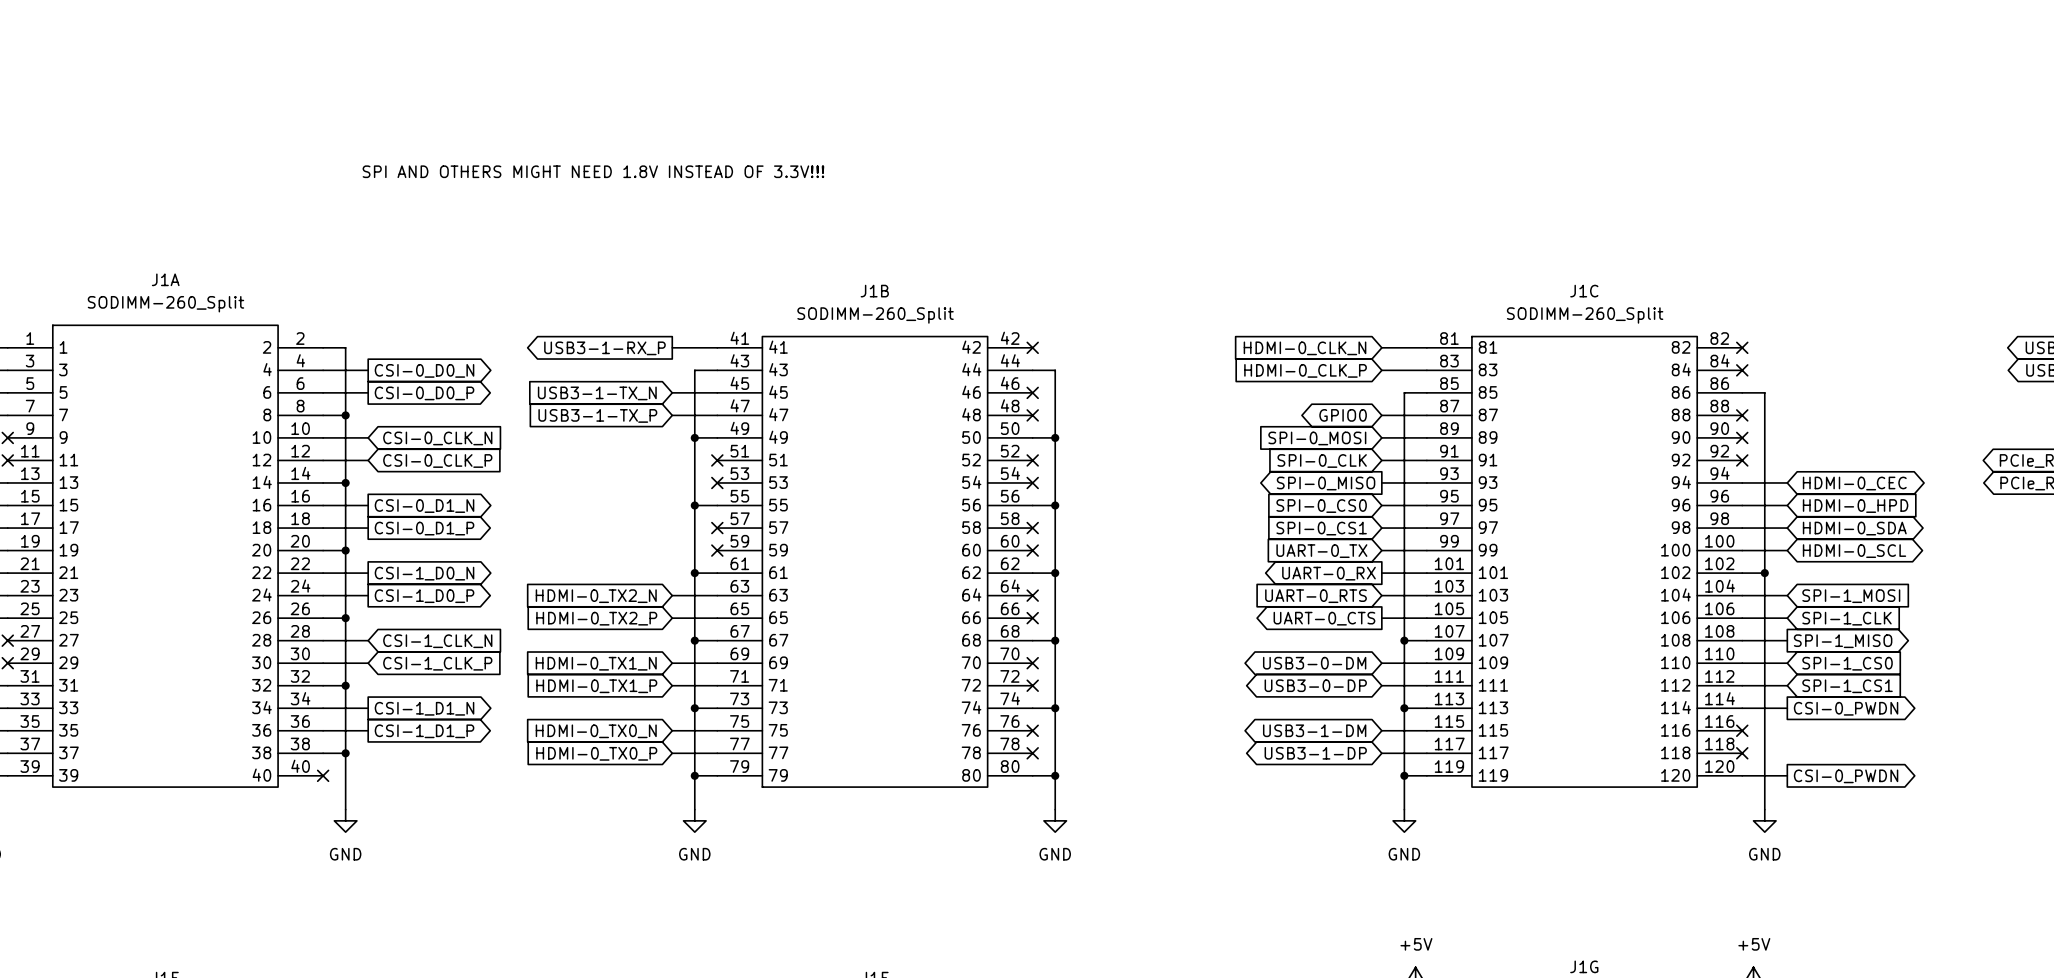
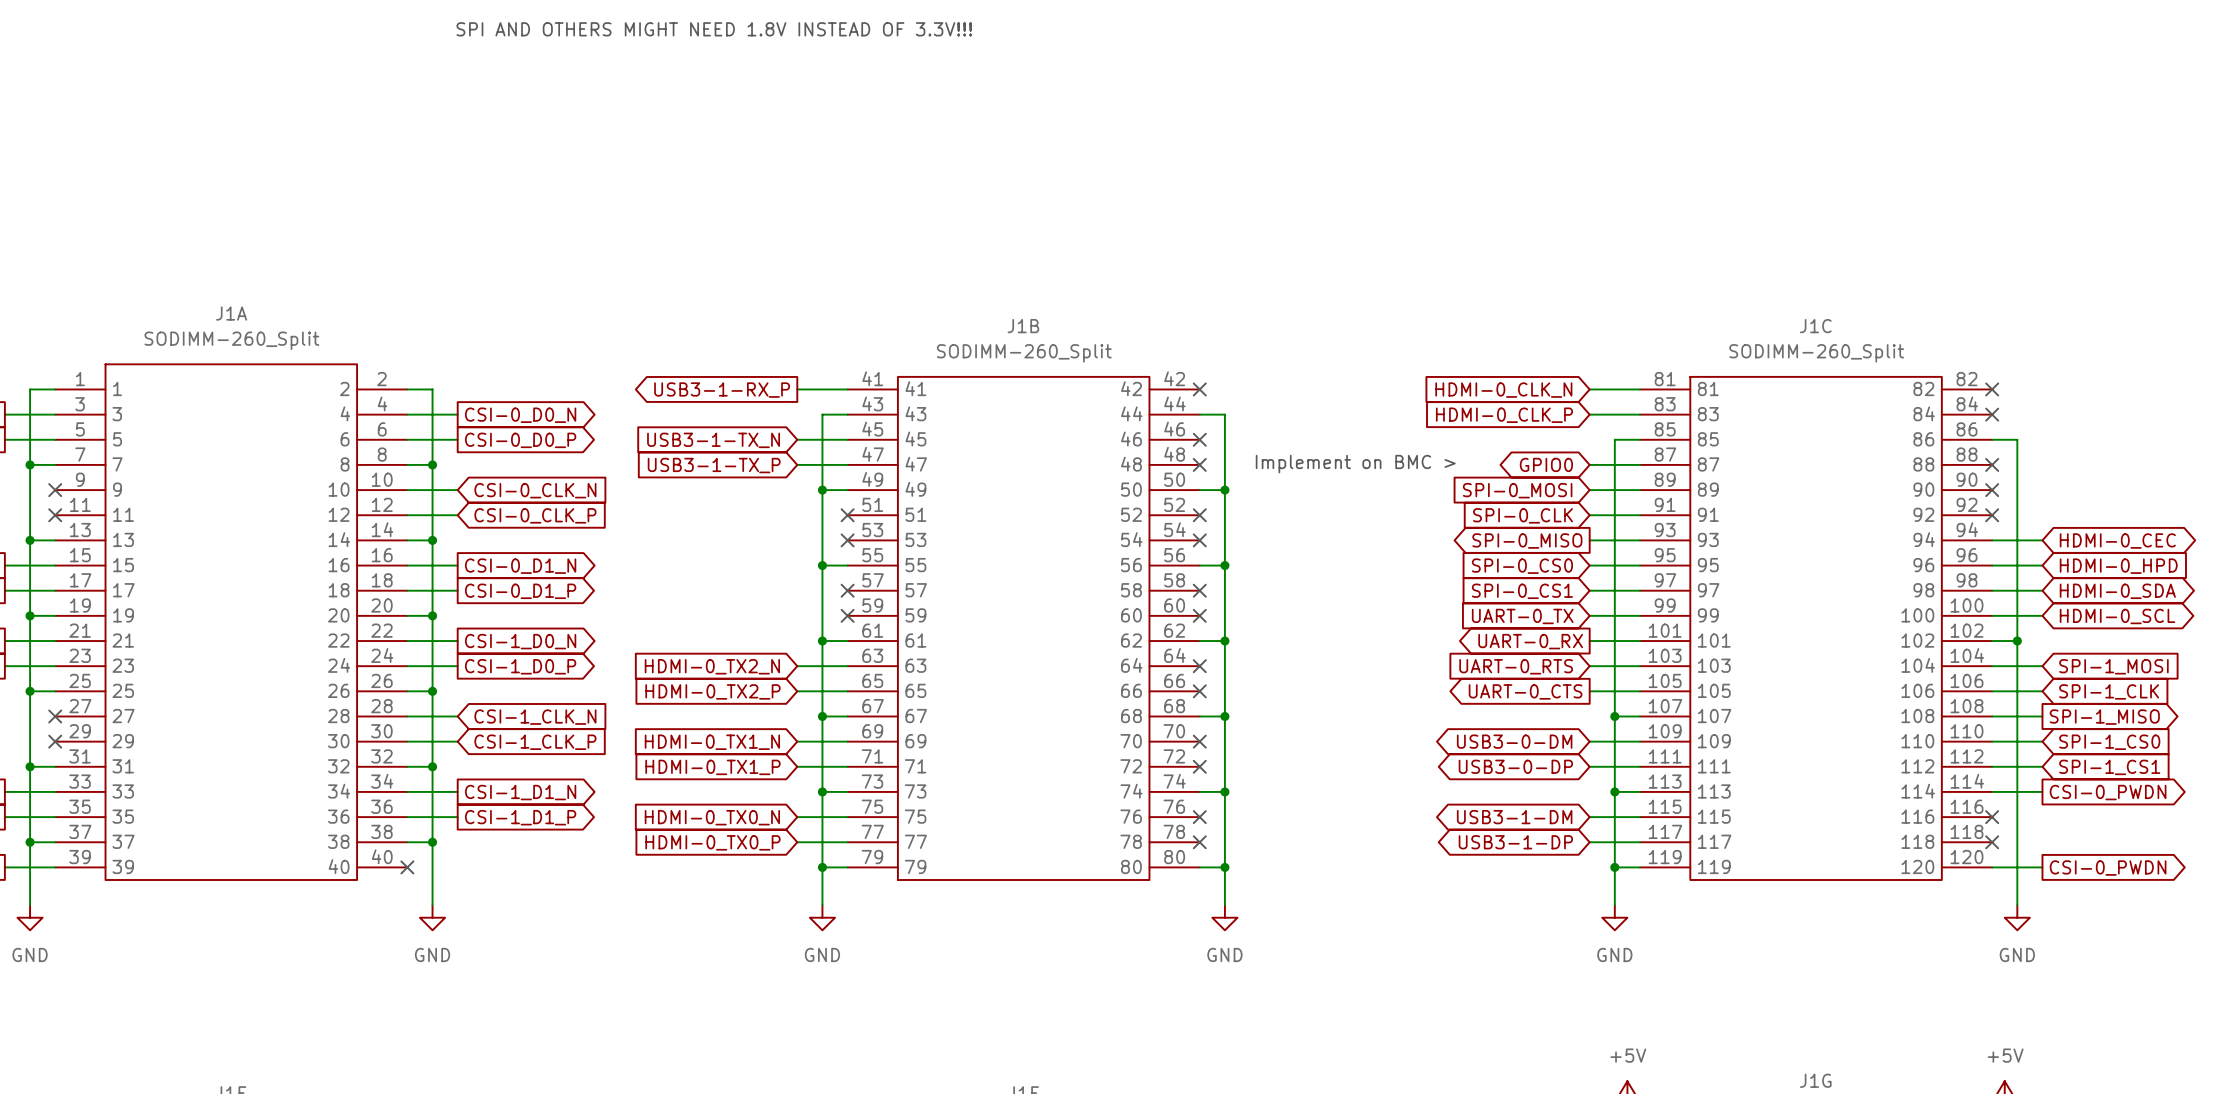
text position: SPI AND OTHERS MIGHT NEED 1.8V INSTEAD OF 3.3V!!! (593, 171) -> SPI AND OTHERS MIGHT NEED 1.8V INSTEAD OF 3.3V!!! (714, 29)
text: none -> Implement on BMC > (1355, 464)

